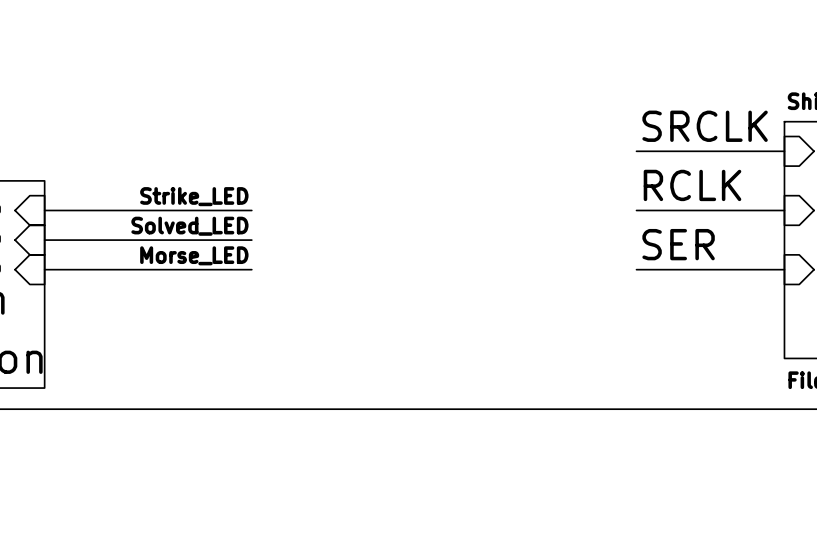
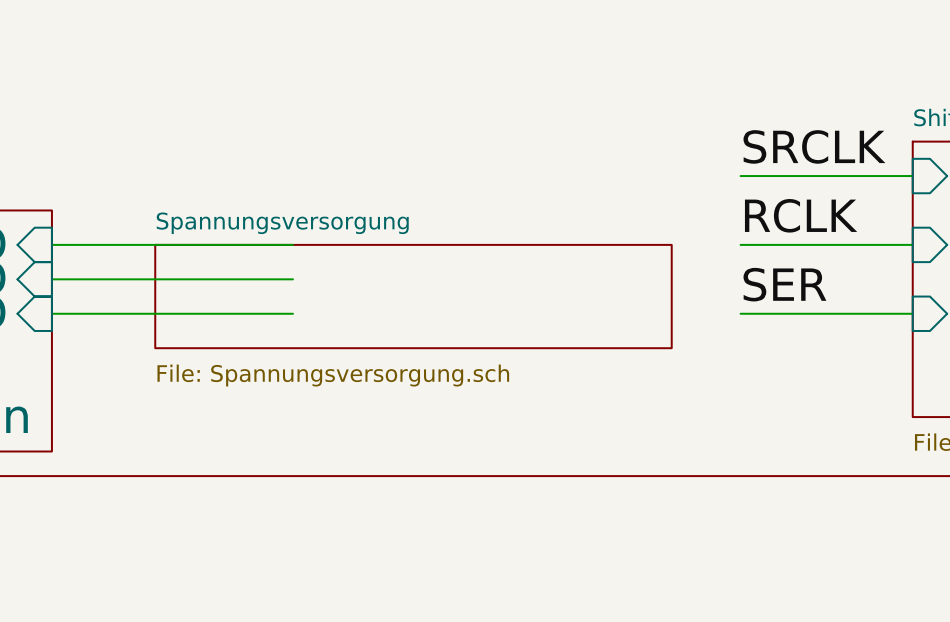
label: Strike_LED (194, 196) -> none
label: Solved_LED (189, 226) -> none
sheet Spannungsversorgung: none -> File: Spannungsversorgung.sch (413, 296)
label: Morse_LED (194, 255) -> none

